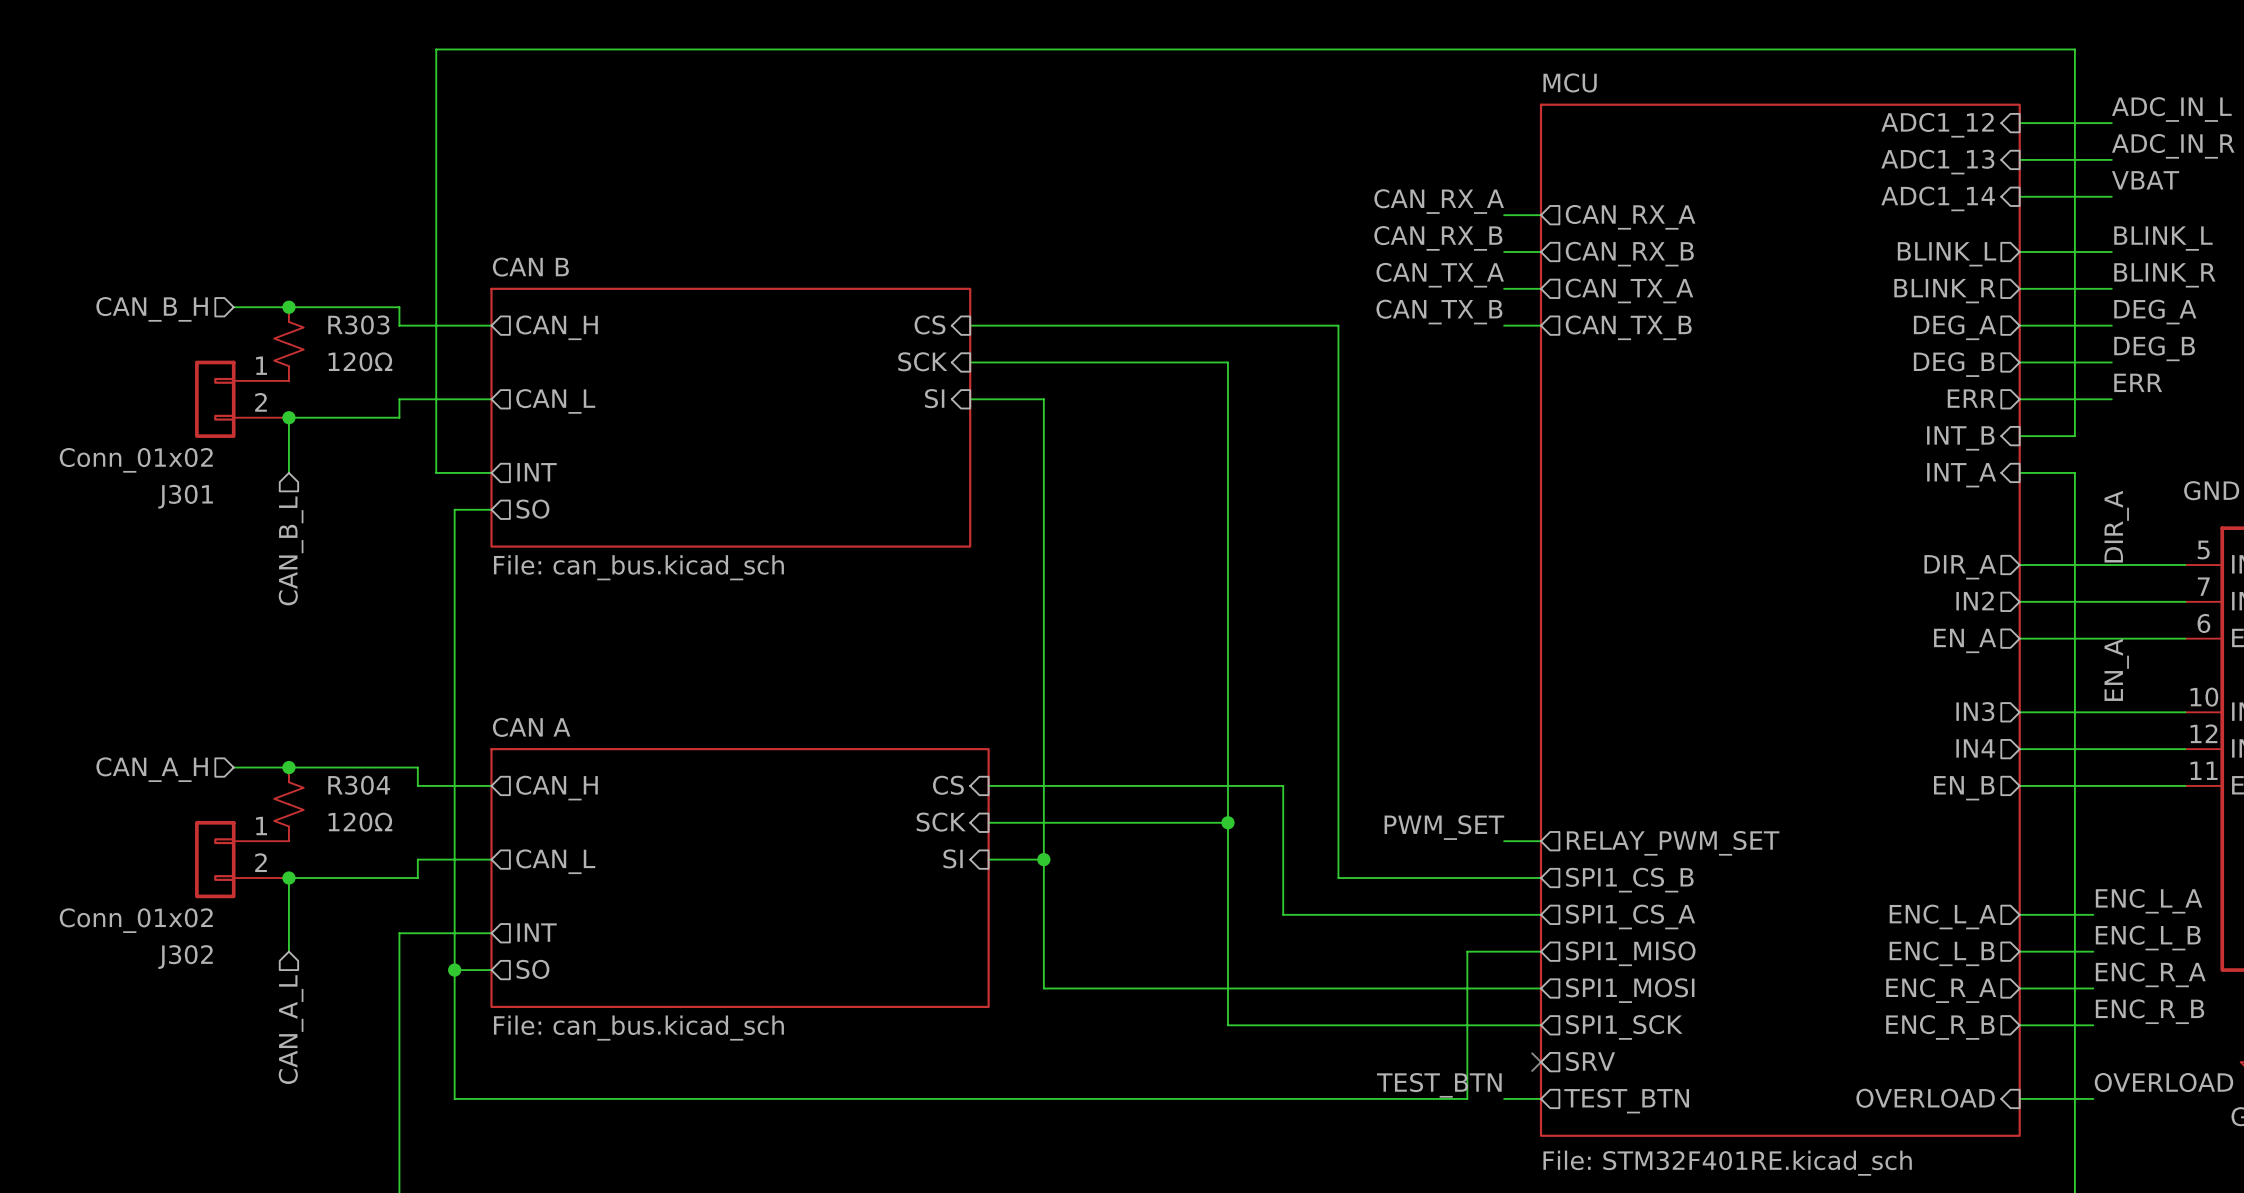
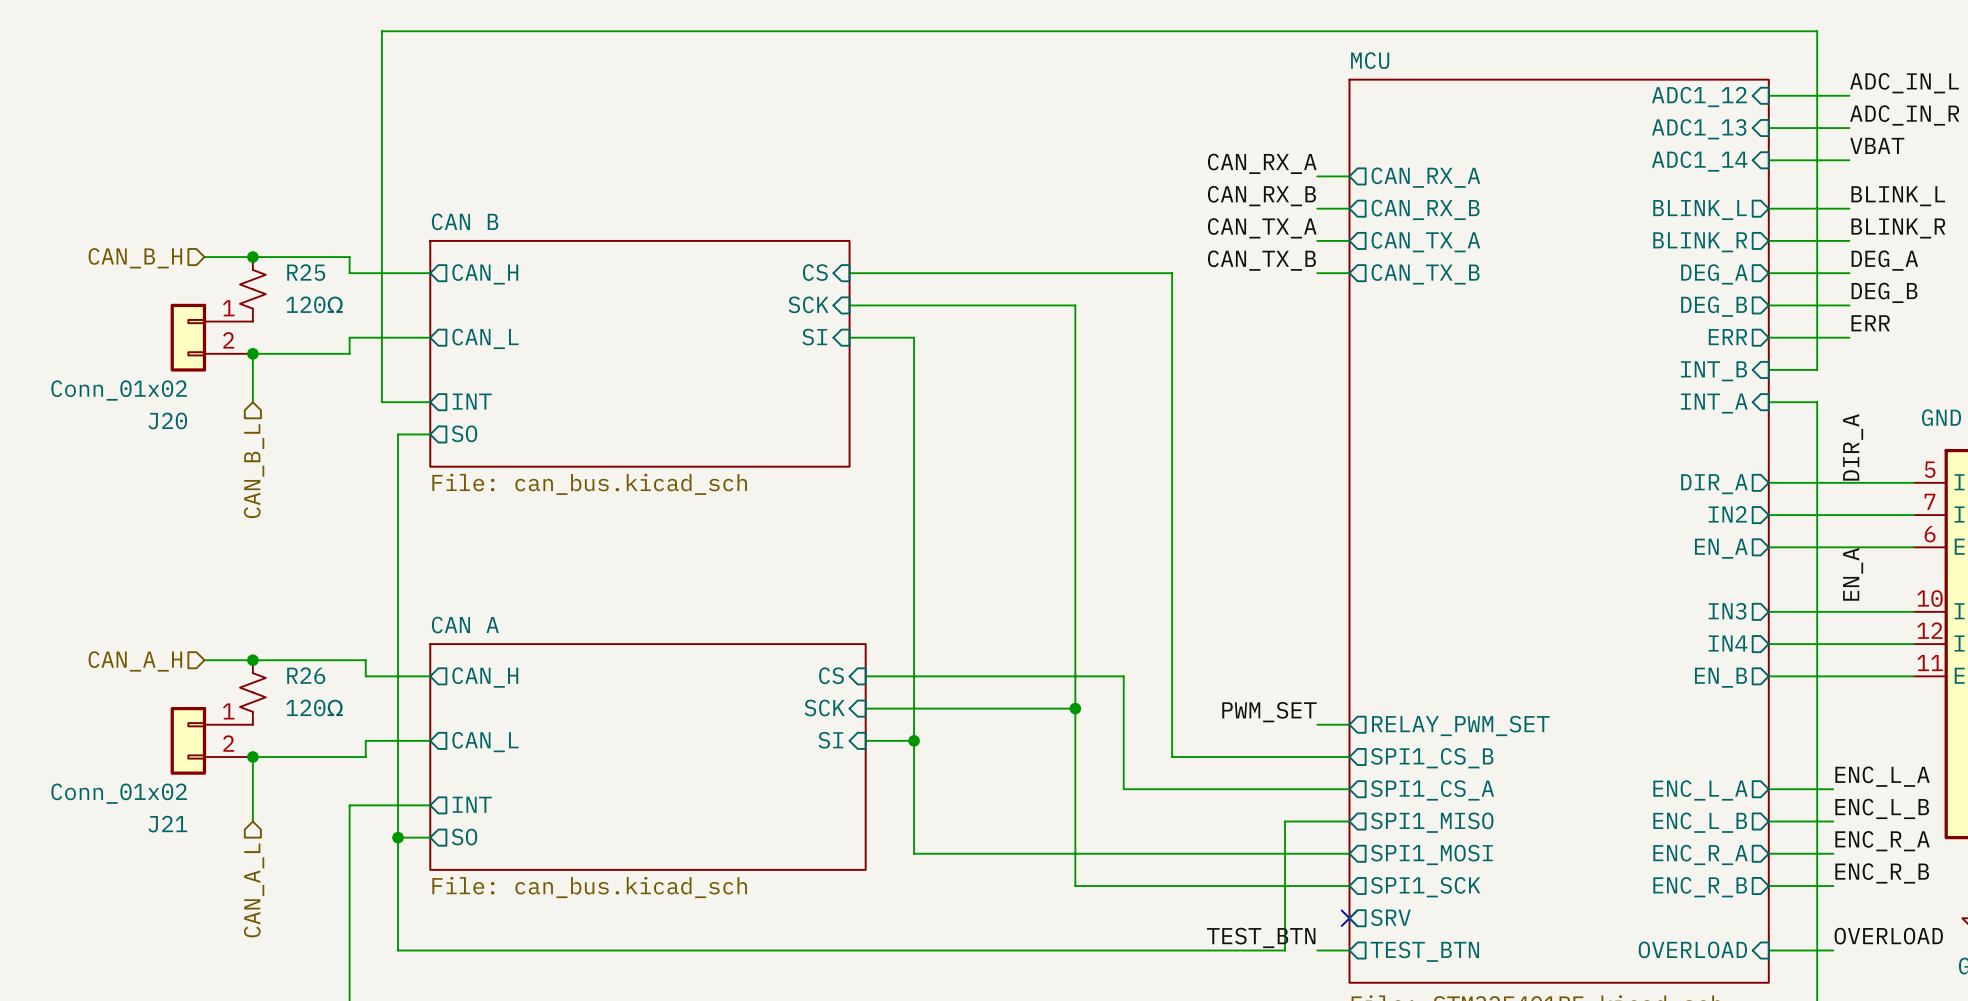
R303 name: R303 (358, 324) -> R25 (306, 272)
J301 name: J301 (185, 496) -> J20 (167, 420)
R304 name: R304 (359, 785) -> R26 (306, 675)
J302 name: J302 (185, 957) -> J21 (167, 824)

